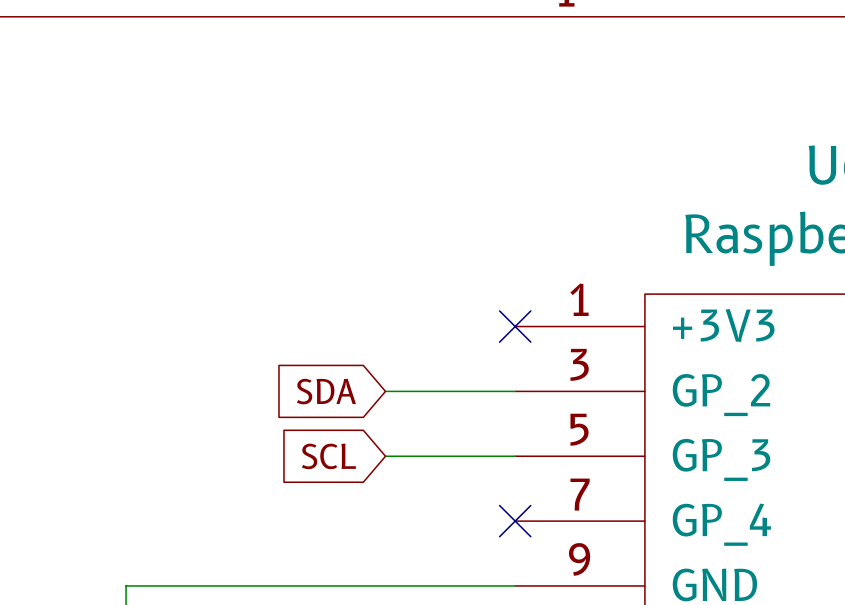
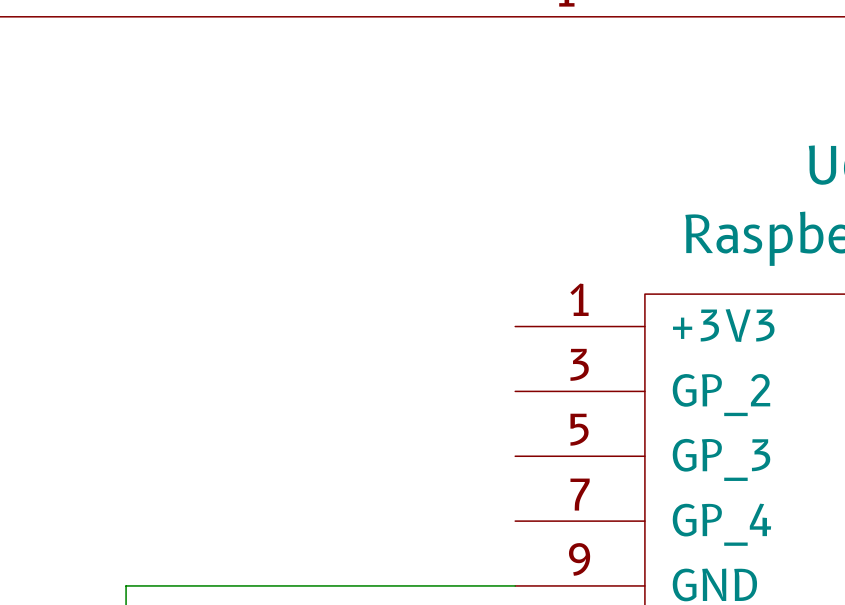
no-connect mark: (515, 326) -> none
global label: SDA (326, 391) -> none
wire: (385, 391) (515, 391) -> none
global label: SCL (328, 456) -> none
wire: (385, 456) (515, 456) -> none
no-connect mark: (515, 521) -> none

